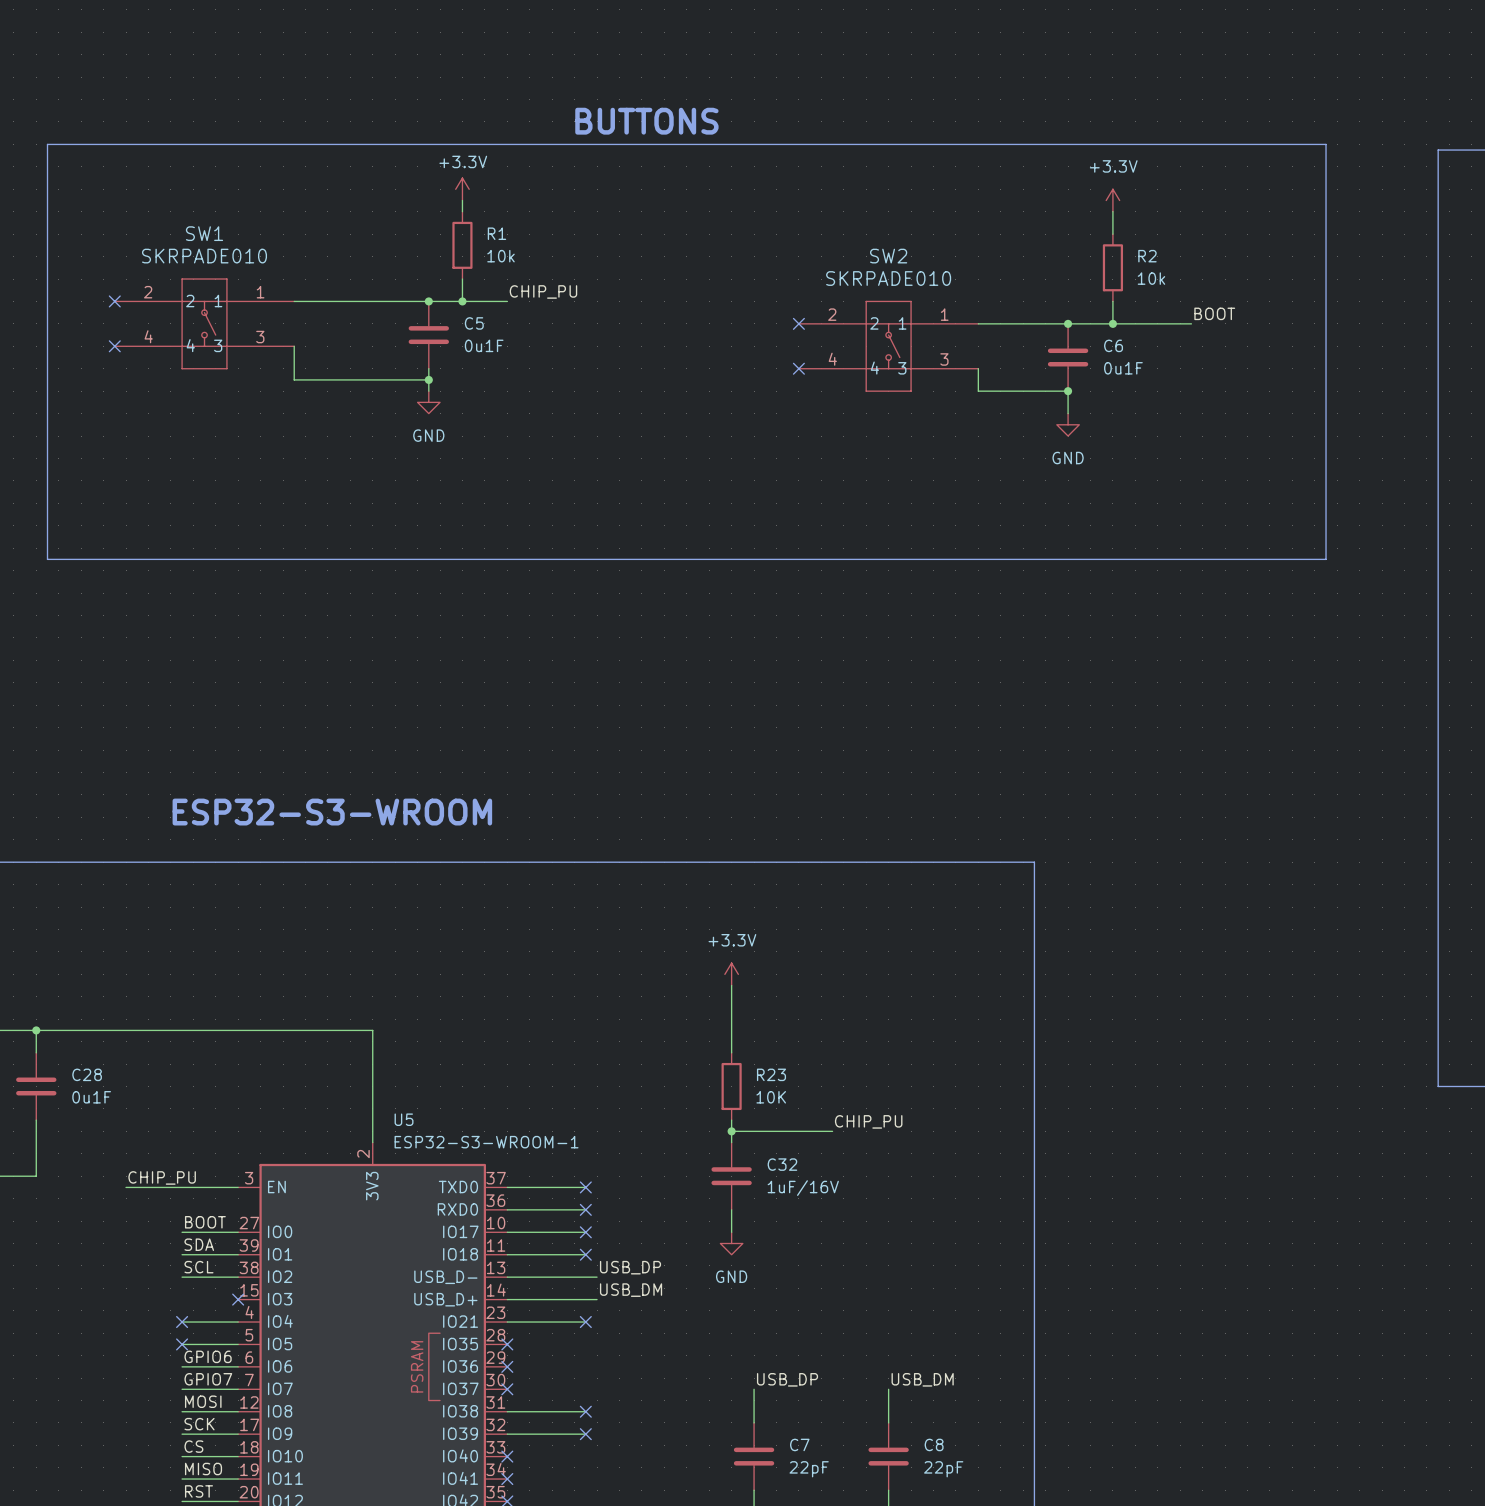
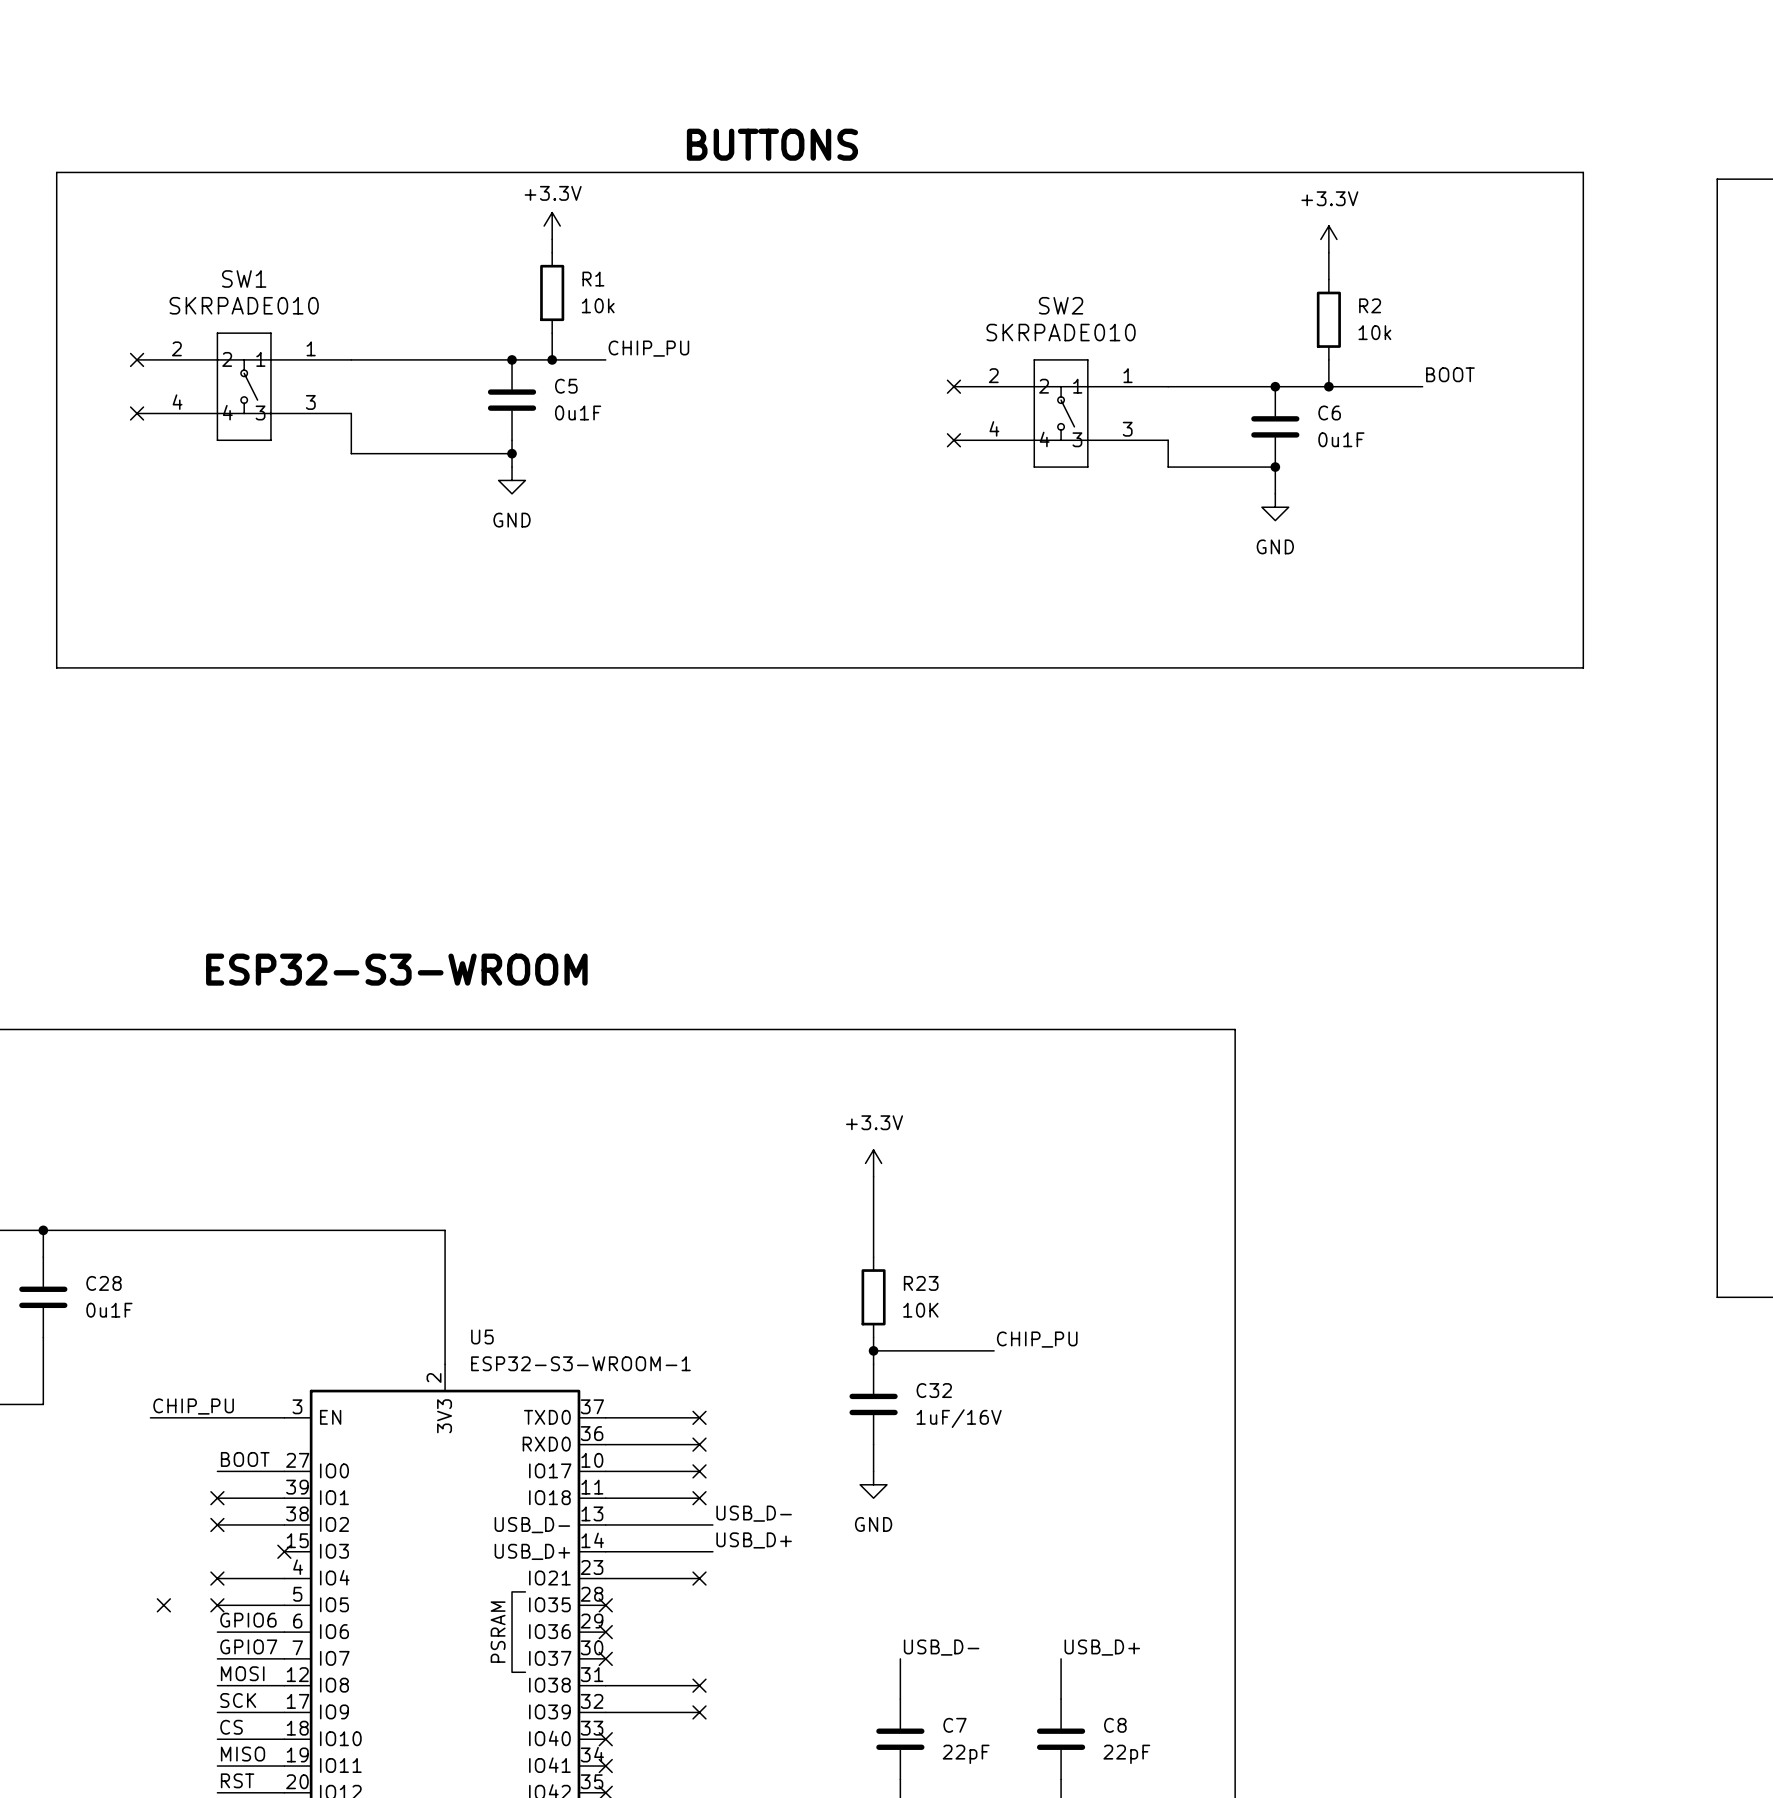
label: SDA (199, 1244) -> none
no-connect mark: none -> (217, 1498)
label: SCL (198, 1267) -> none
label: USB_DP (630, 1267) -> USB_D- (754, 1513)
no-connect mark: none -> (217, 1524)
label: USB_DM (631, 1290) -> USB_D+ (754, 1540)
no-connect mark: none -> (163, 1605)
label: USB_DP (787, 1379) -> USB_D- (941, 1647)
label: USB_DM (922, 1379) -> USB_D+ (1102, 1647)

